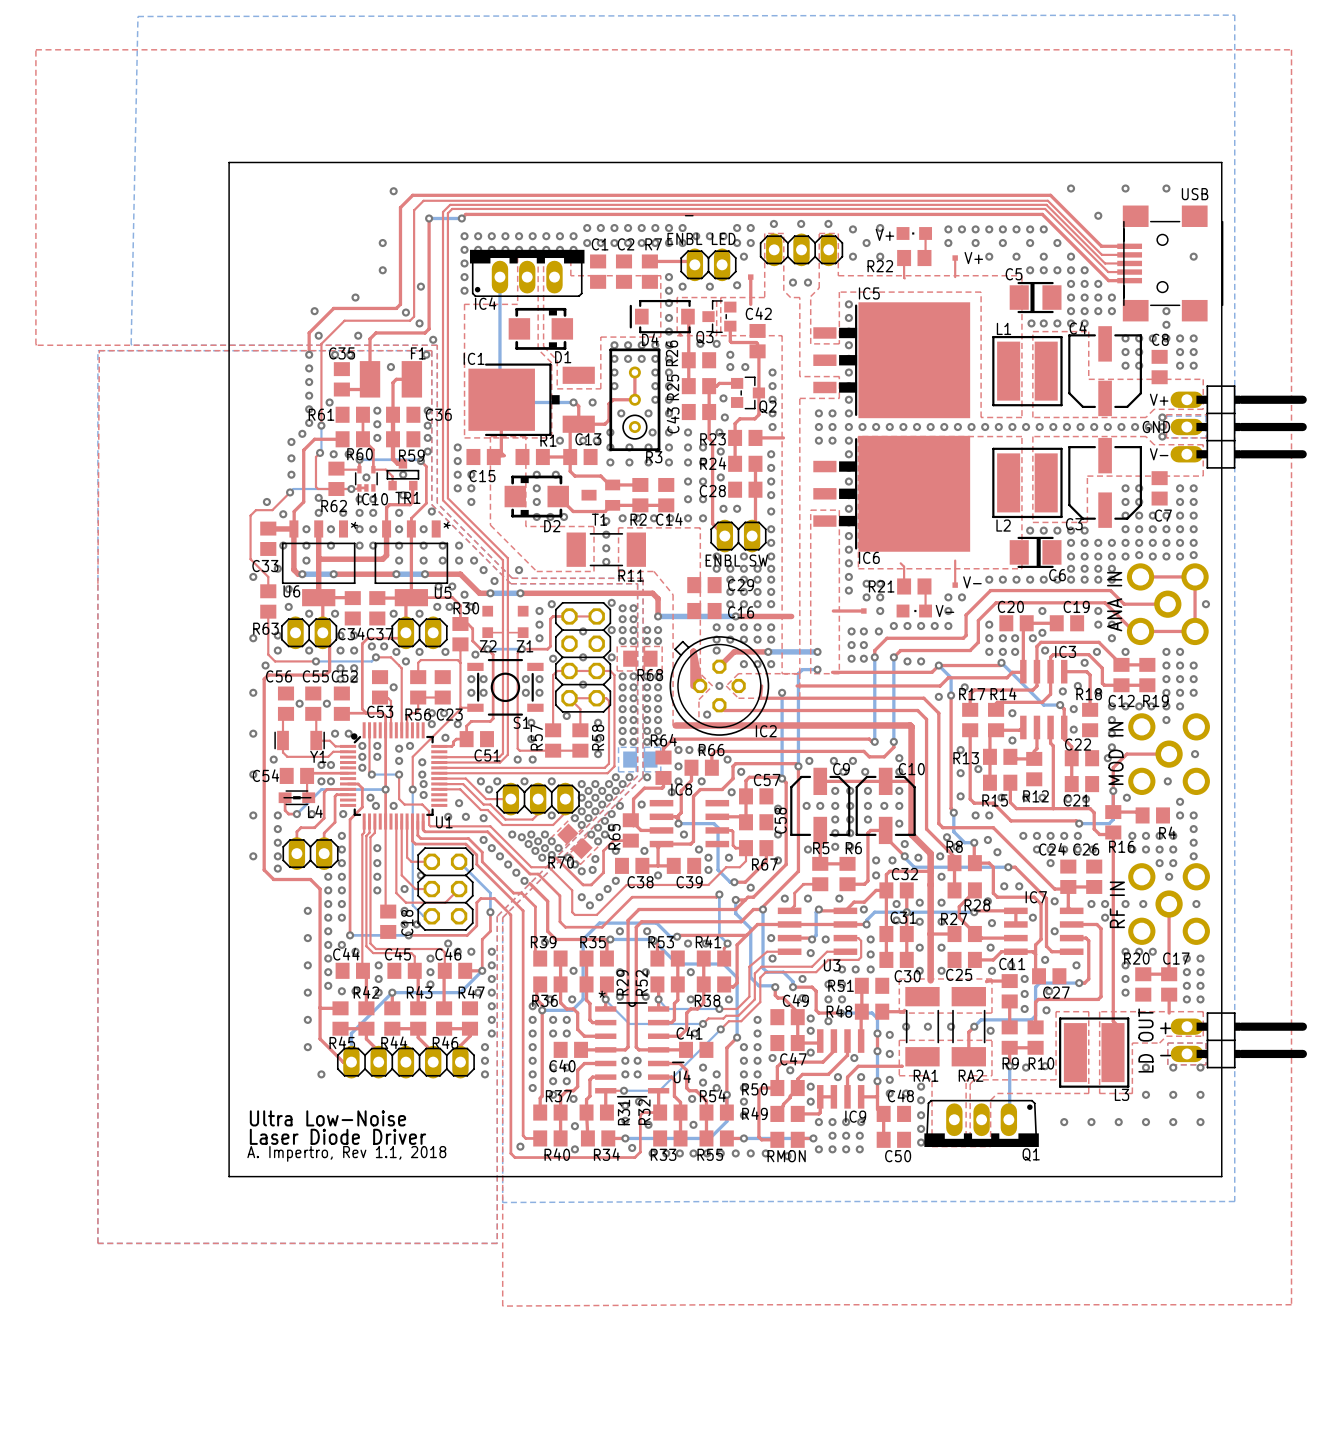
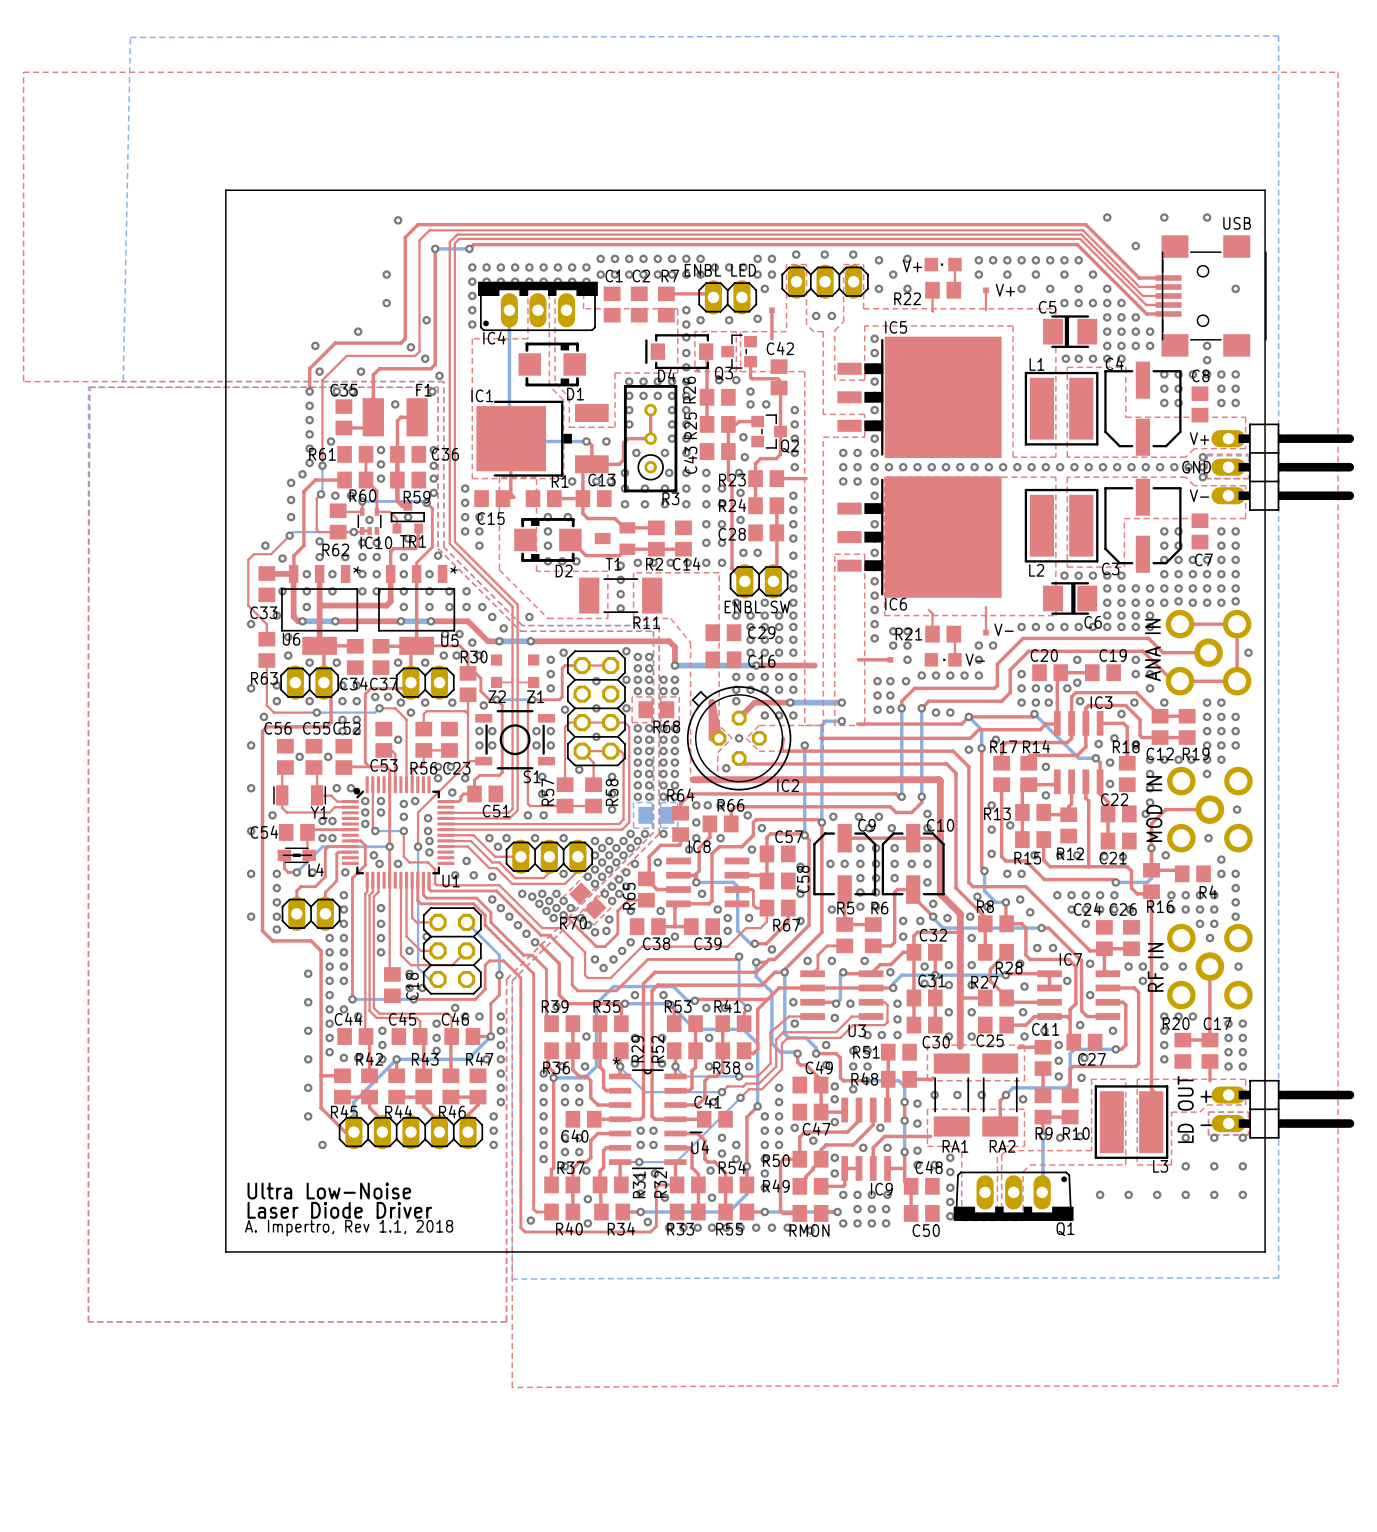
text: - (689, 215) -> none

